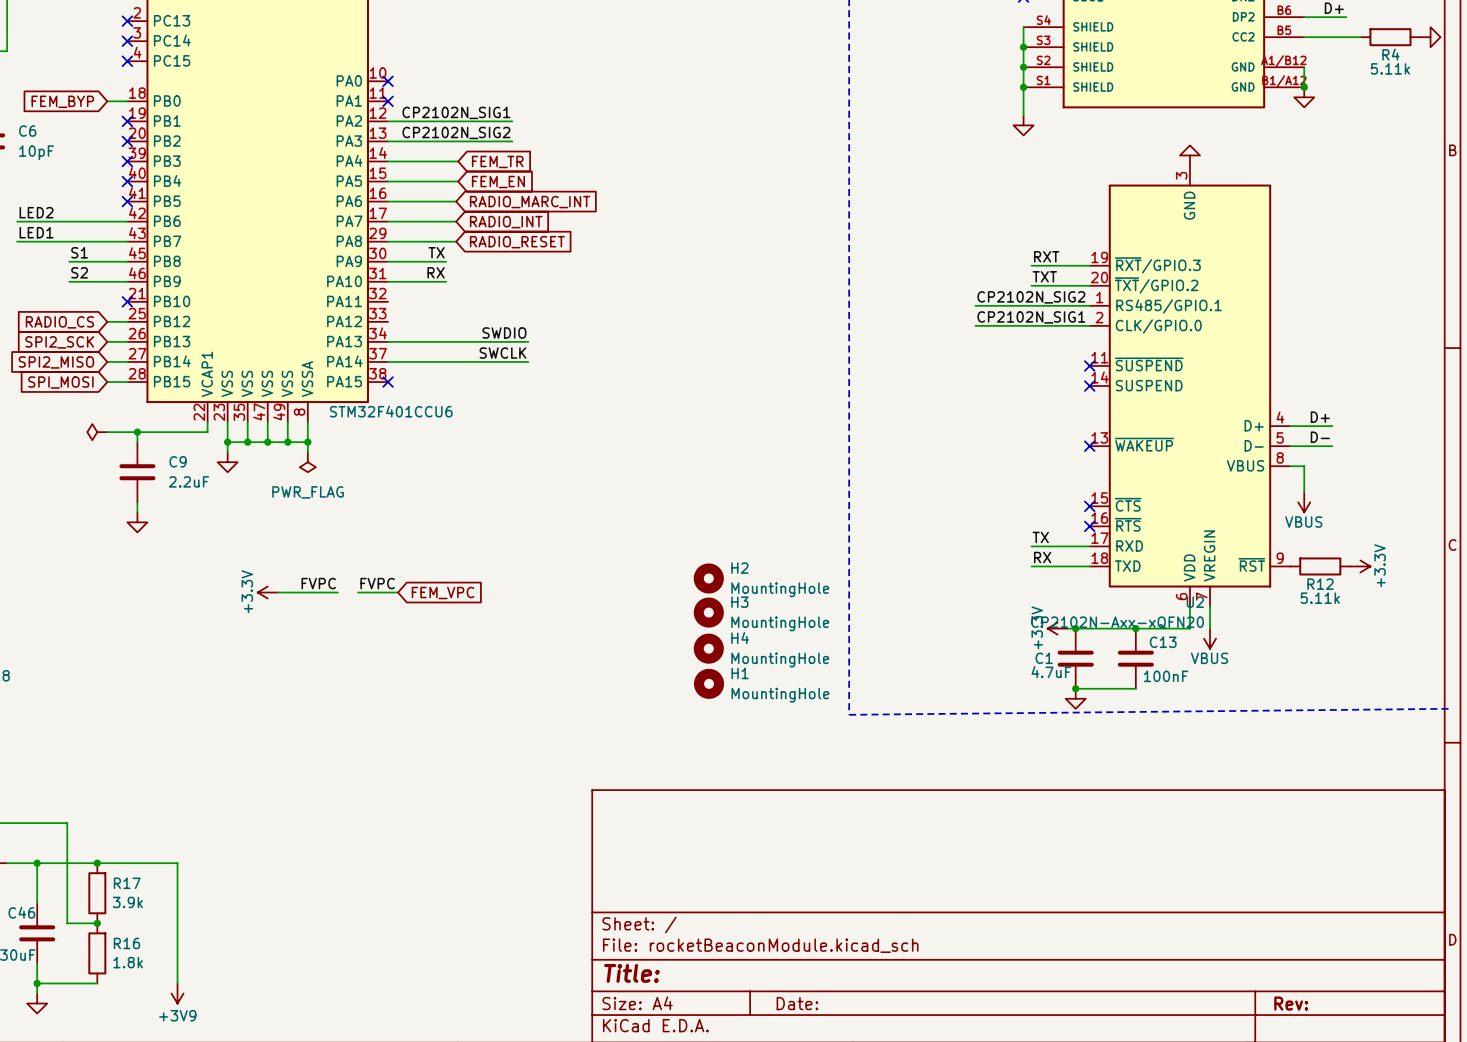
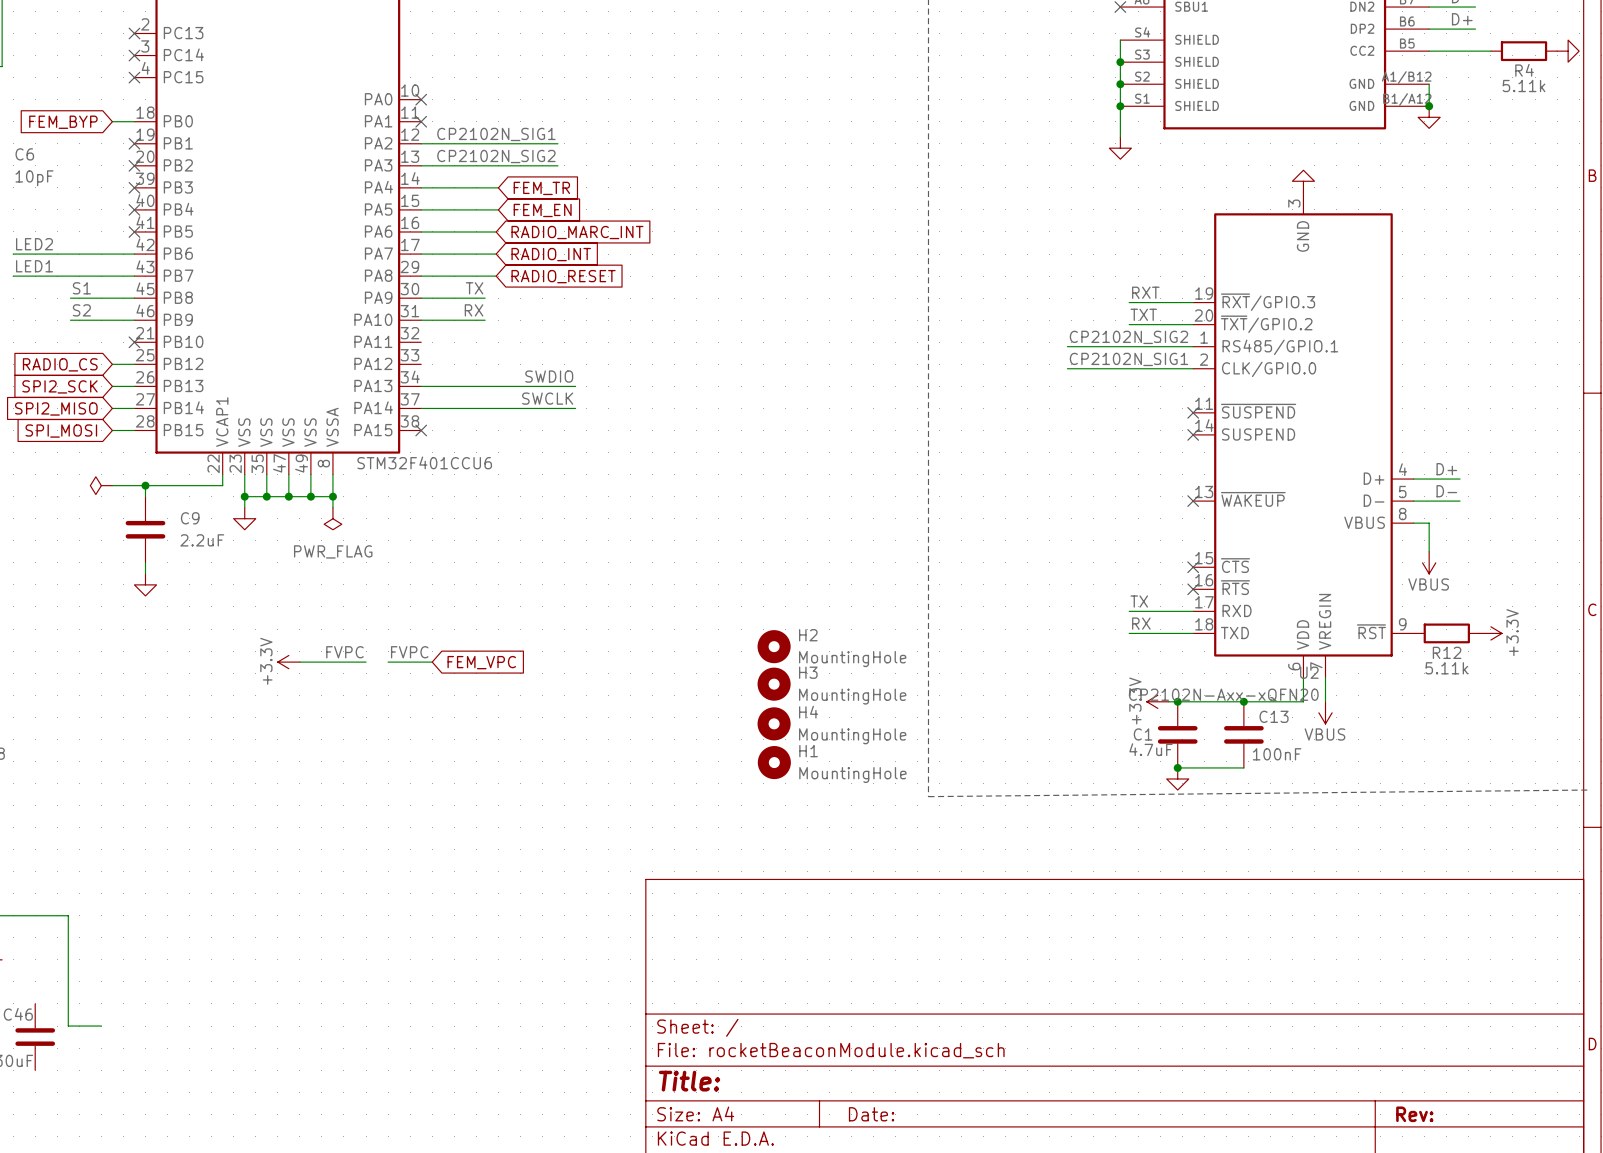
wire: (7, 863) (177, 863) (177, 983) -> none
wire: (37, 863) (37, 903) -> none
junction: (37, 863) -> none
junction: (97, 863) -> none
R17: 3.9k (97, 893) -> none
junction: (97, 923) -> none
R16: 1.8k (97, 953) -> none
wire: (37, 963) (37, 993) -> none
wire: (37, 983) (97, 983) -> none
junction: (37, 983) -> none
power symbol: +3V9 (177, 993) -> none
power symbol: (37, 1003) -> none

